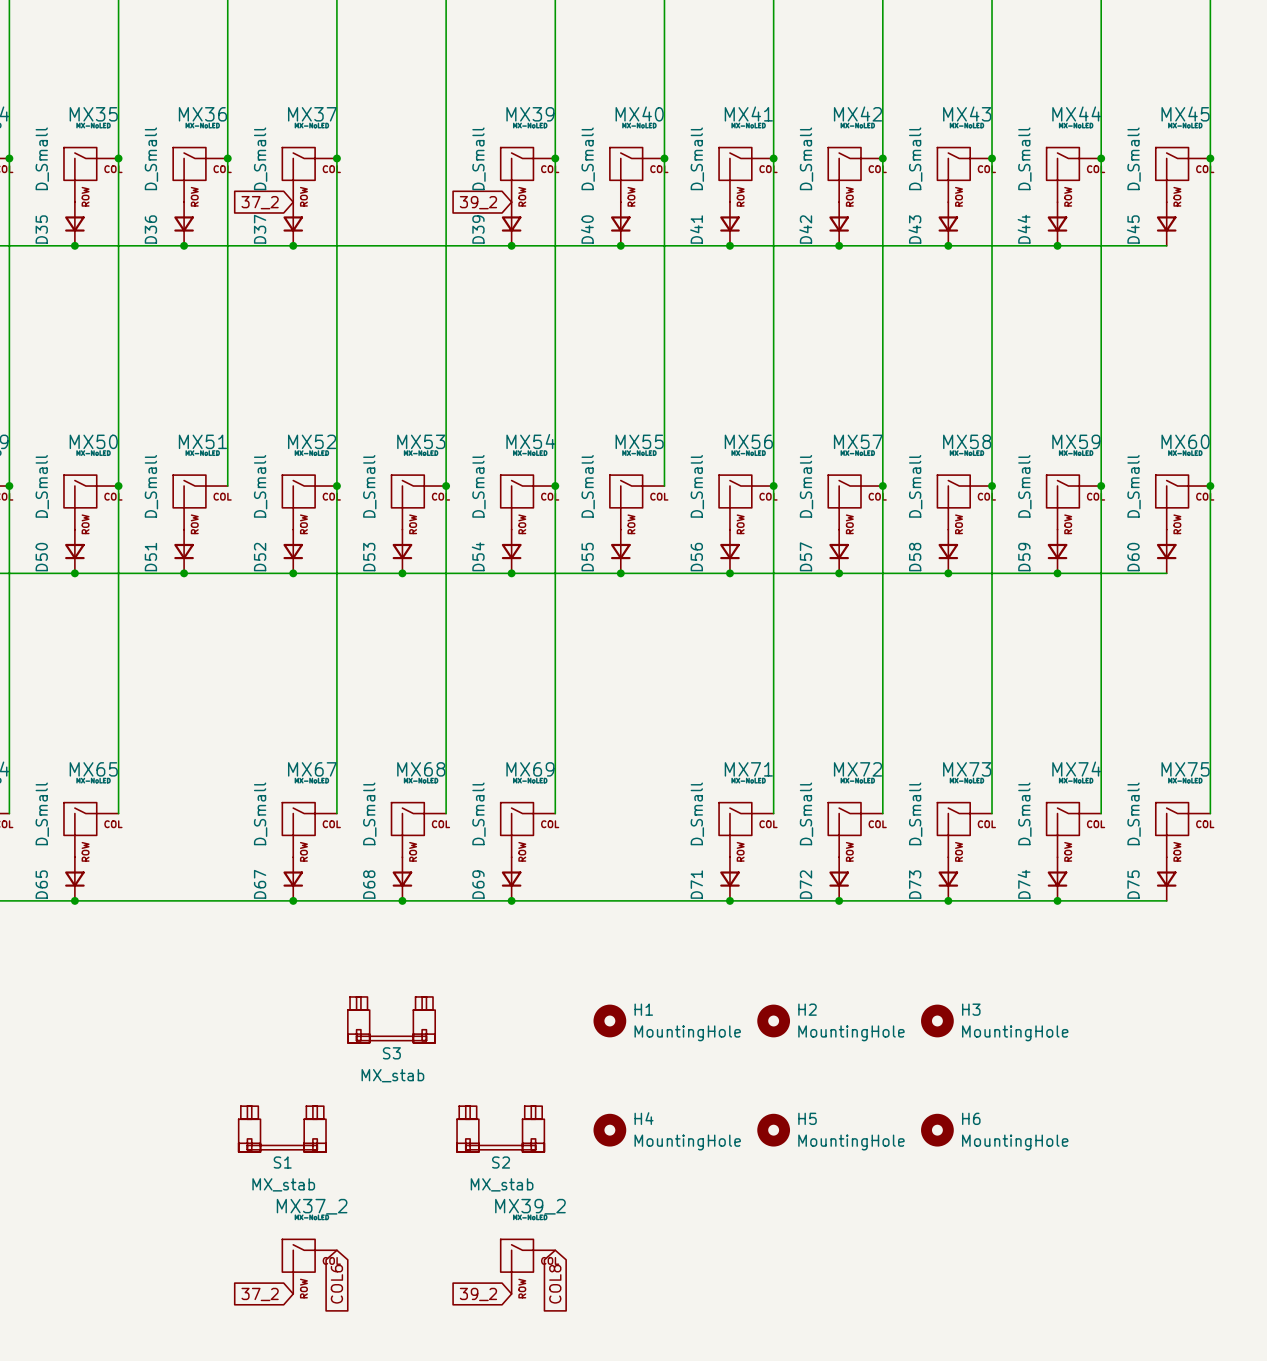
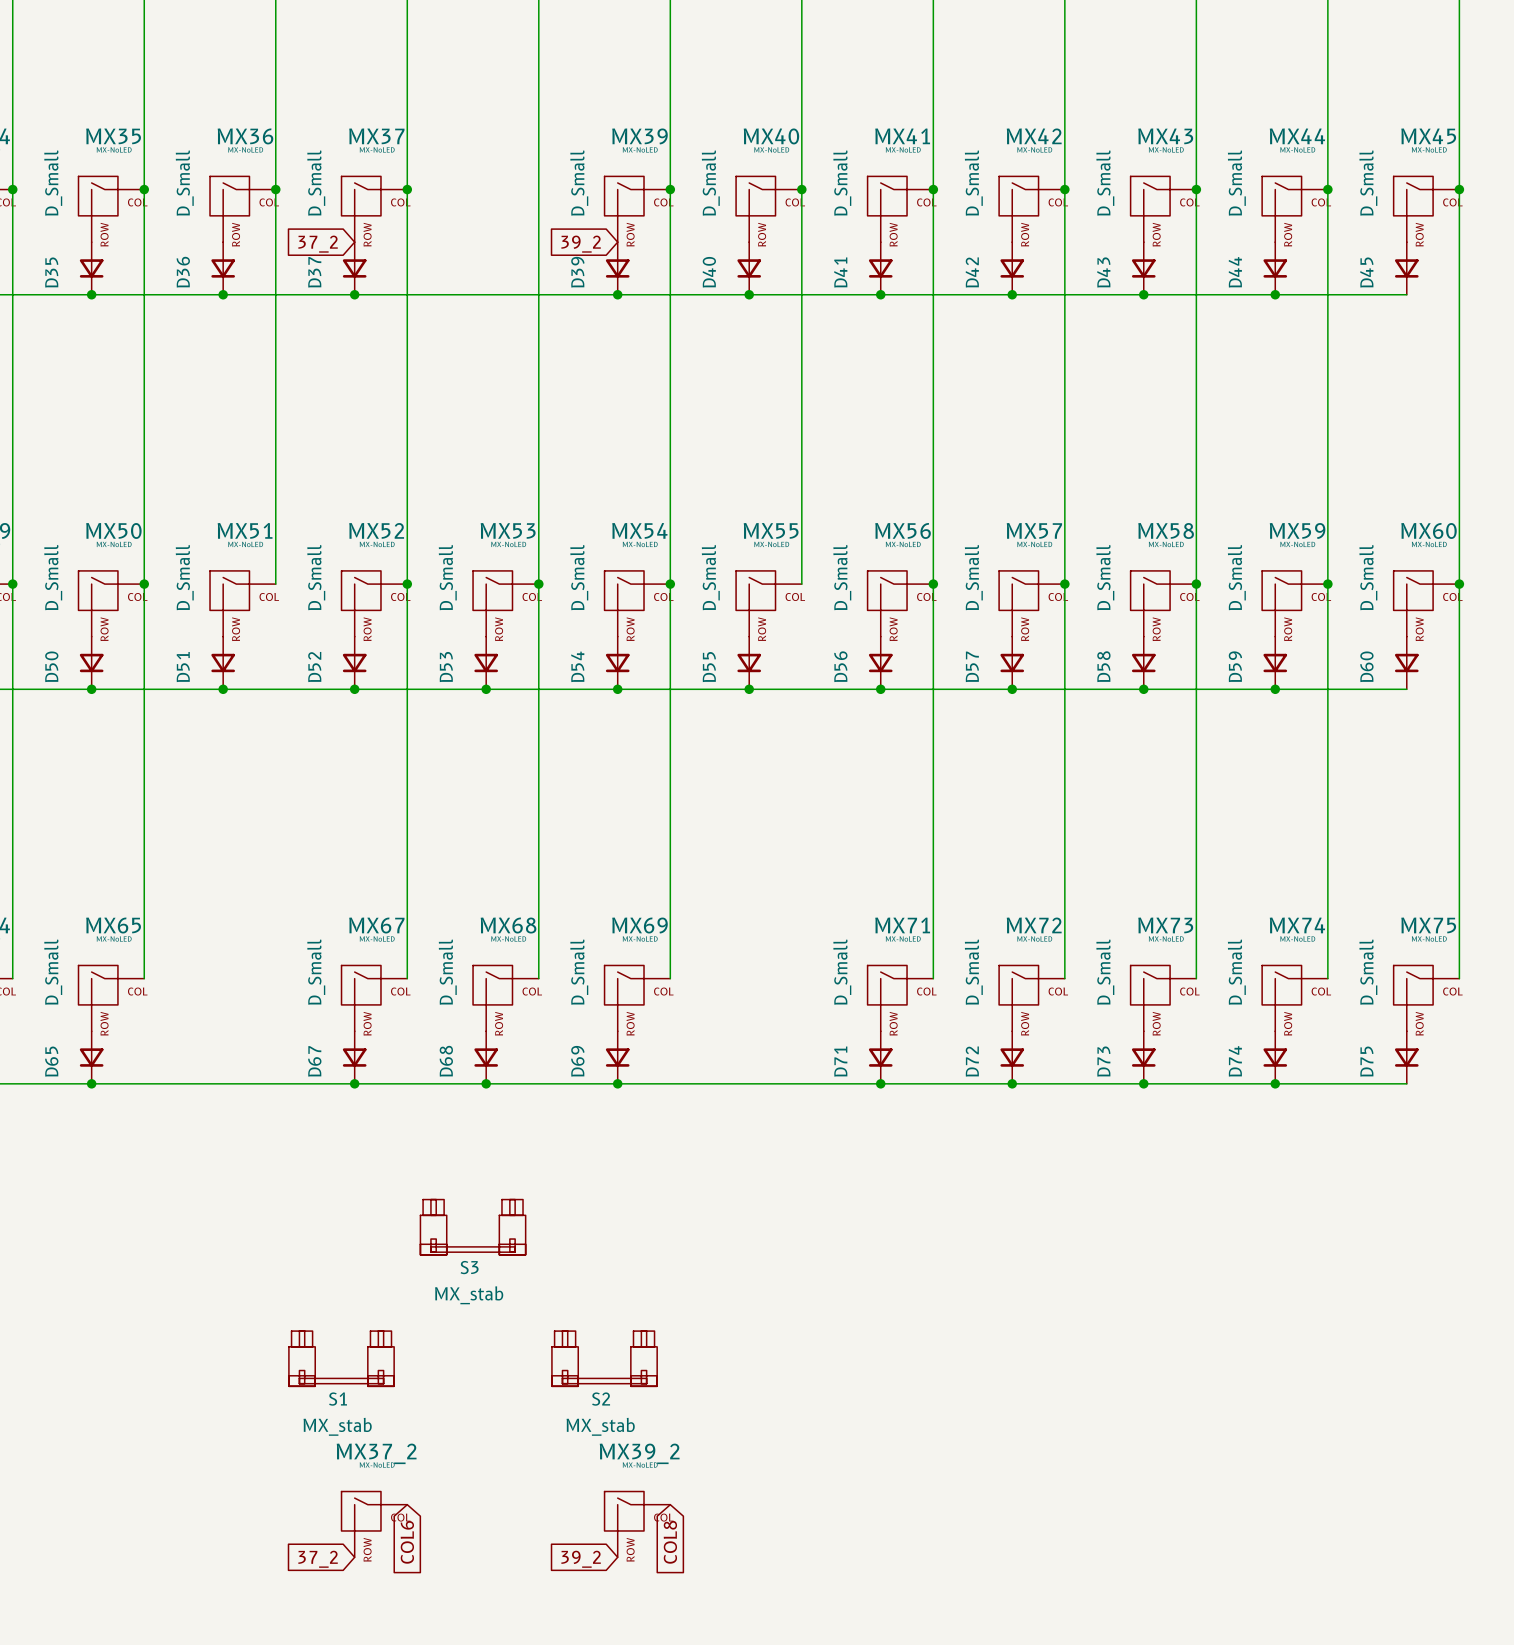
H1: MountingHole (609, 1020) -> none
H2: MountingHole (773, 1020) -> none
H3: MountingHole (937, 1020) -> none
H4: MountingHole (609, 1130) -> none
H5: MountingHole (773, 1130) -> none
H6: MountingHole (937, 1130) -> none

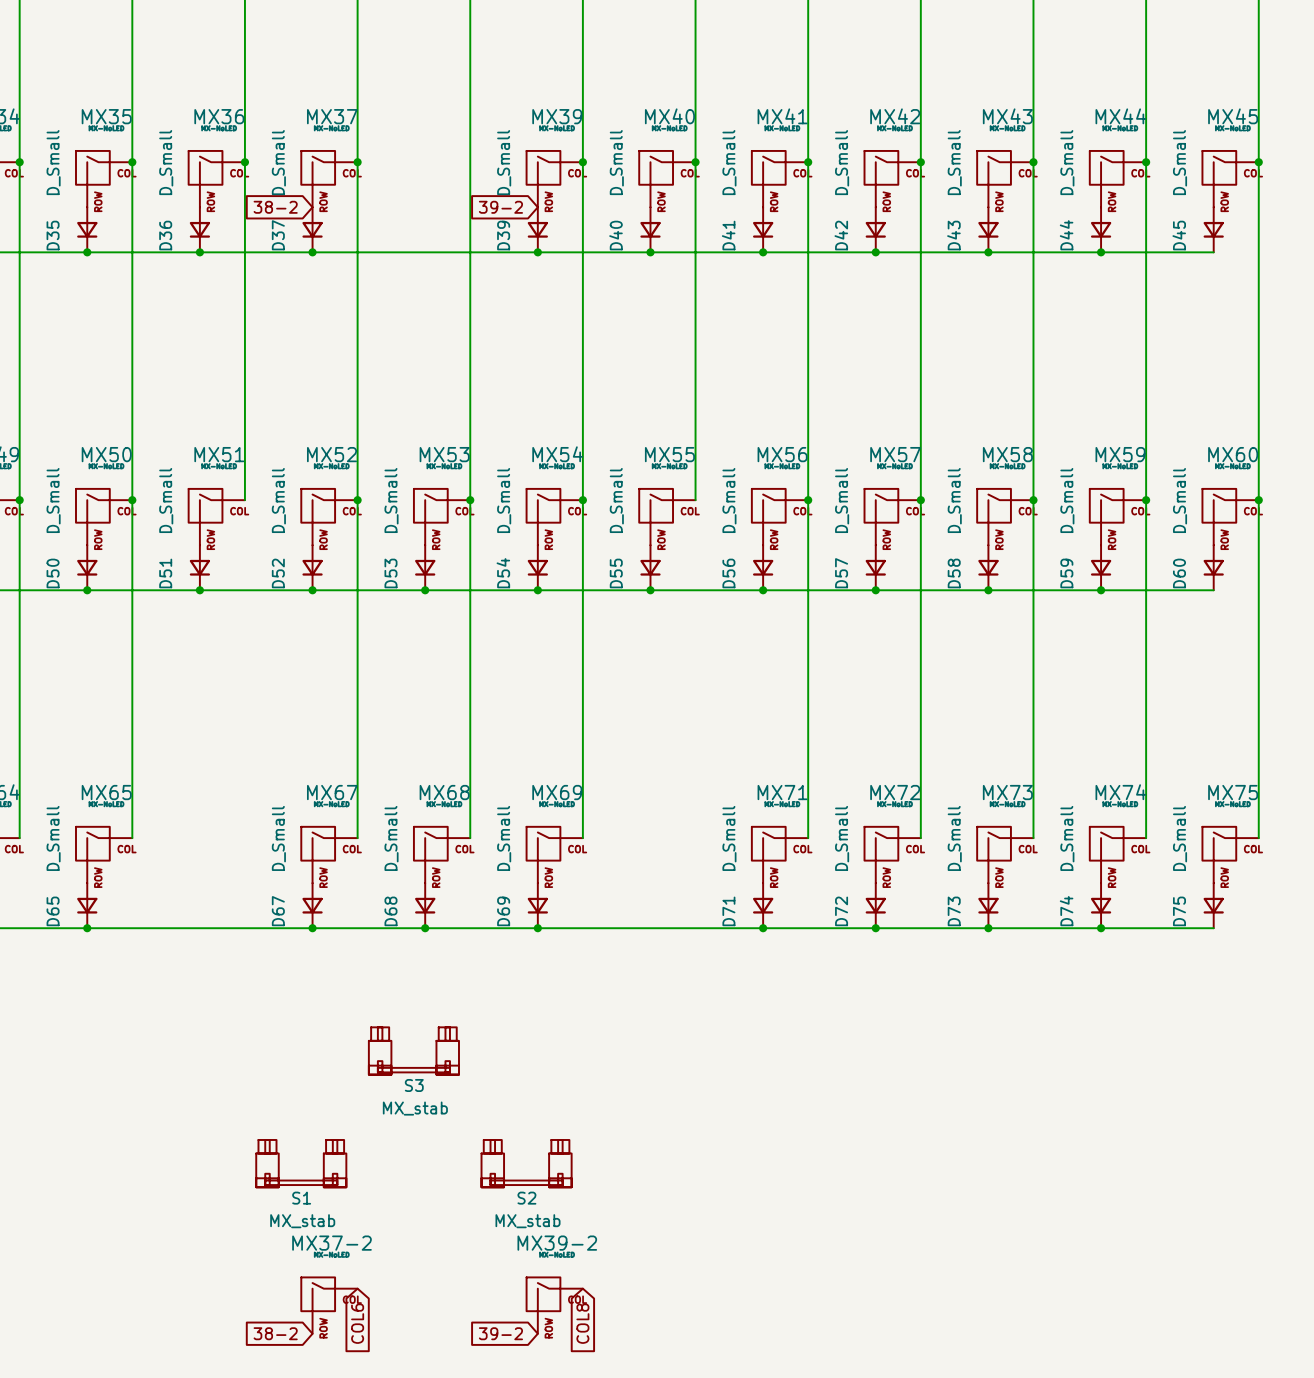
global label: 37_2 (318, 244) -> 38-2 (275, 207)
global label: 39_2 (581, 244) -> 39-2 (500, 207)
MX37_2 name: MX37_2 (376, 1453) -> MX37-2 (331, 1243)
MX39_2 name: MX39_2 (639, 1453) -> MX39-2 (557, 1243)
global label: 37_2 (318, 1559) -> 38-2 (275, 1333)
global label: 39_2 (581, 1559) -> 39-2 (500, 1333)

